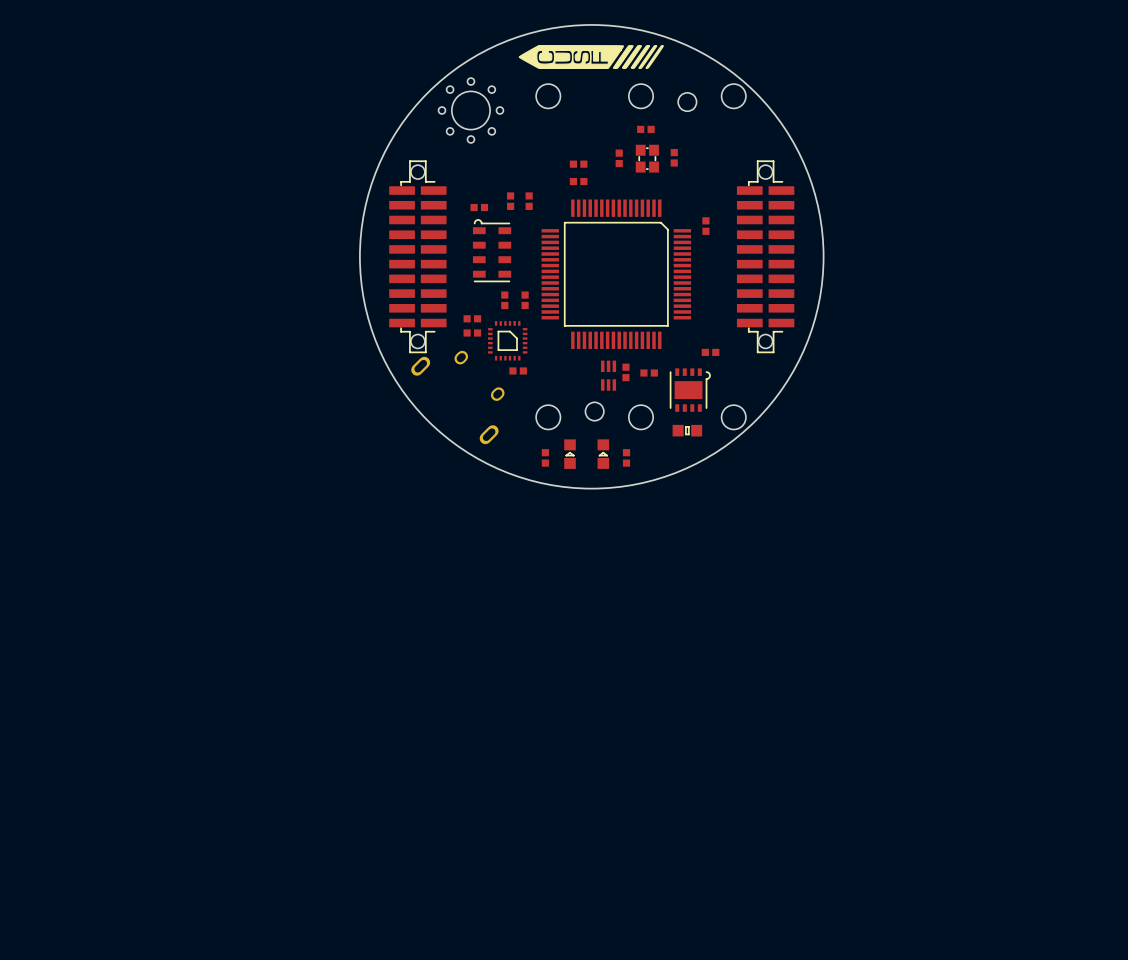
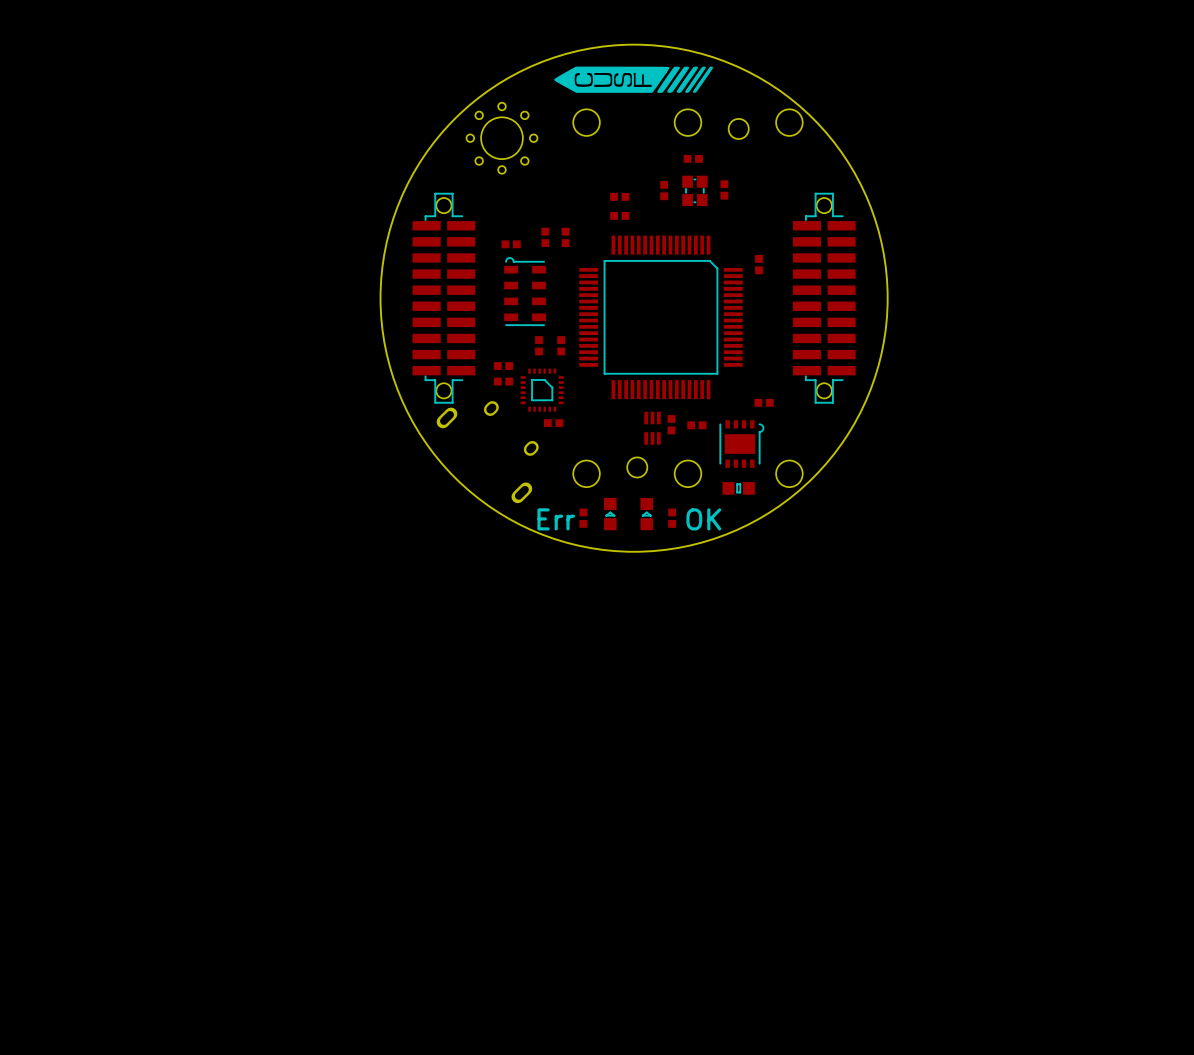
text: none -> Err (556, 519)
text: none -> OK (703, 519)

